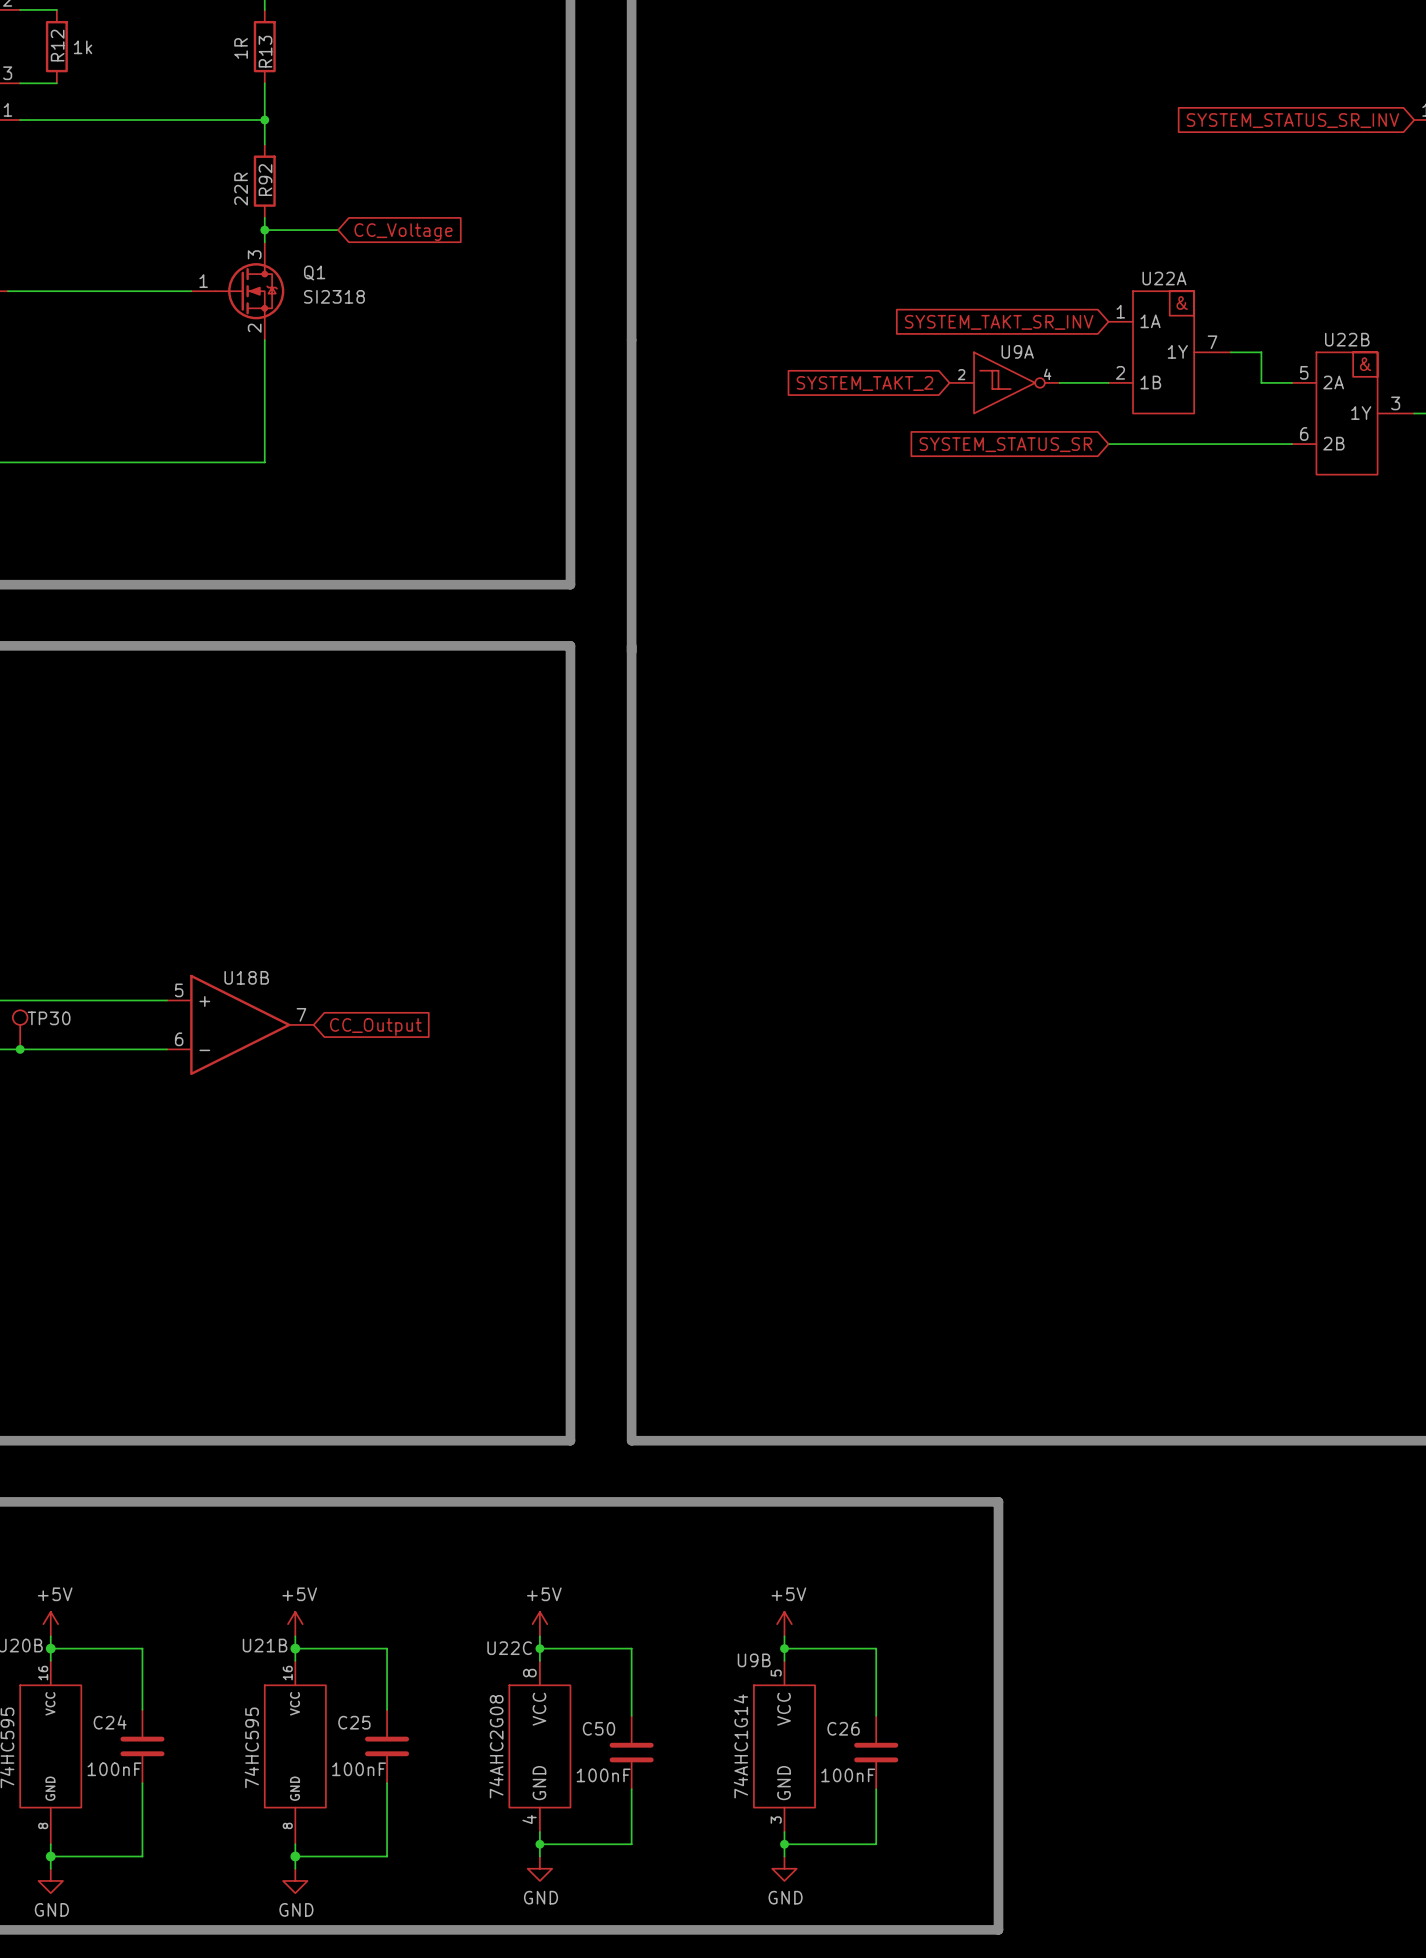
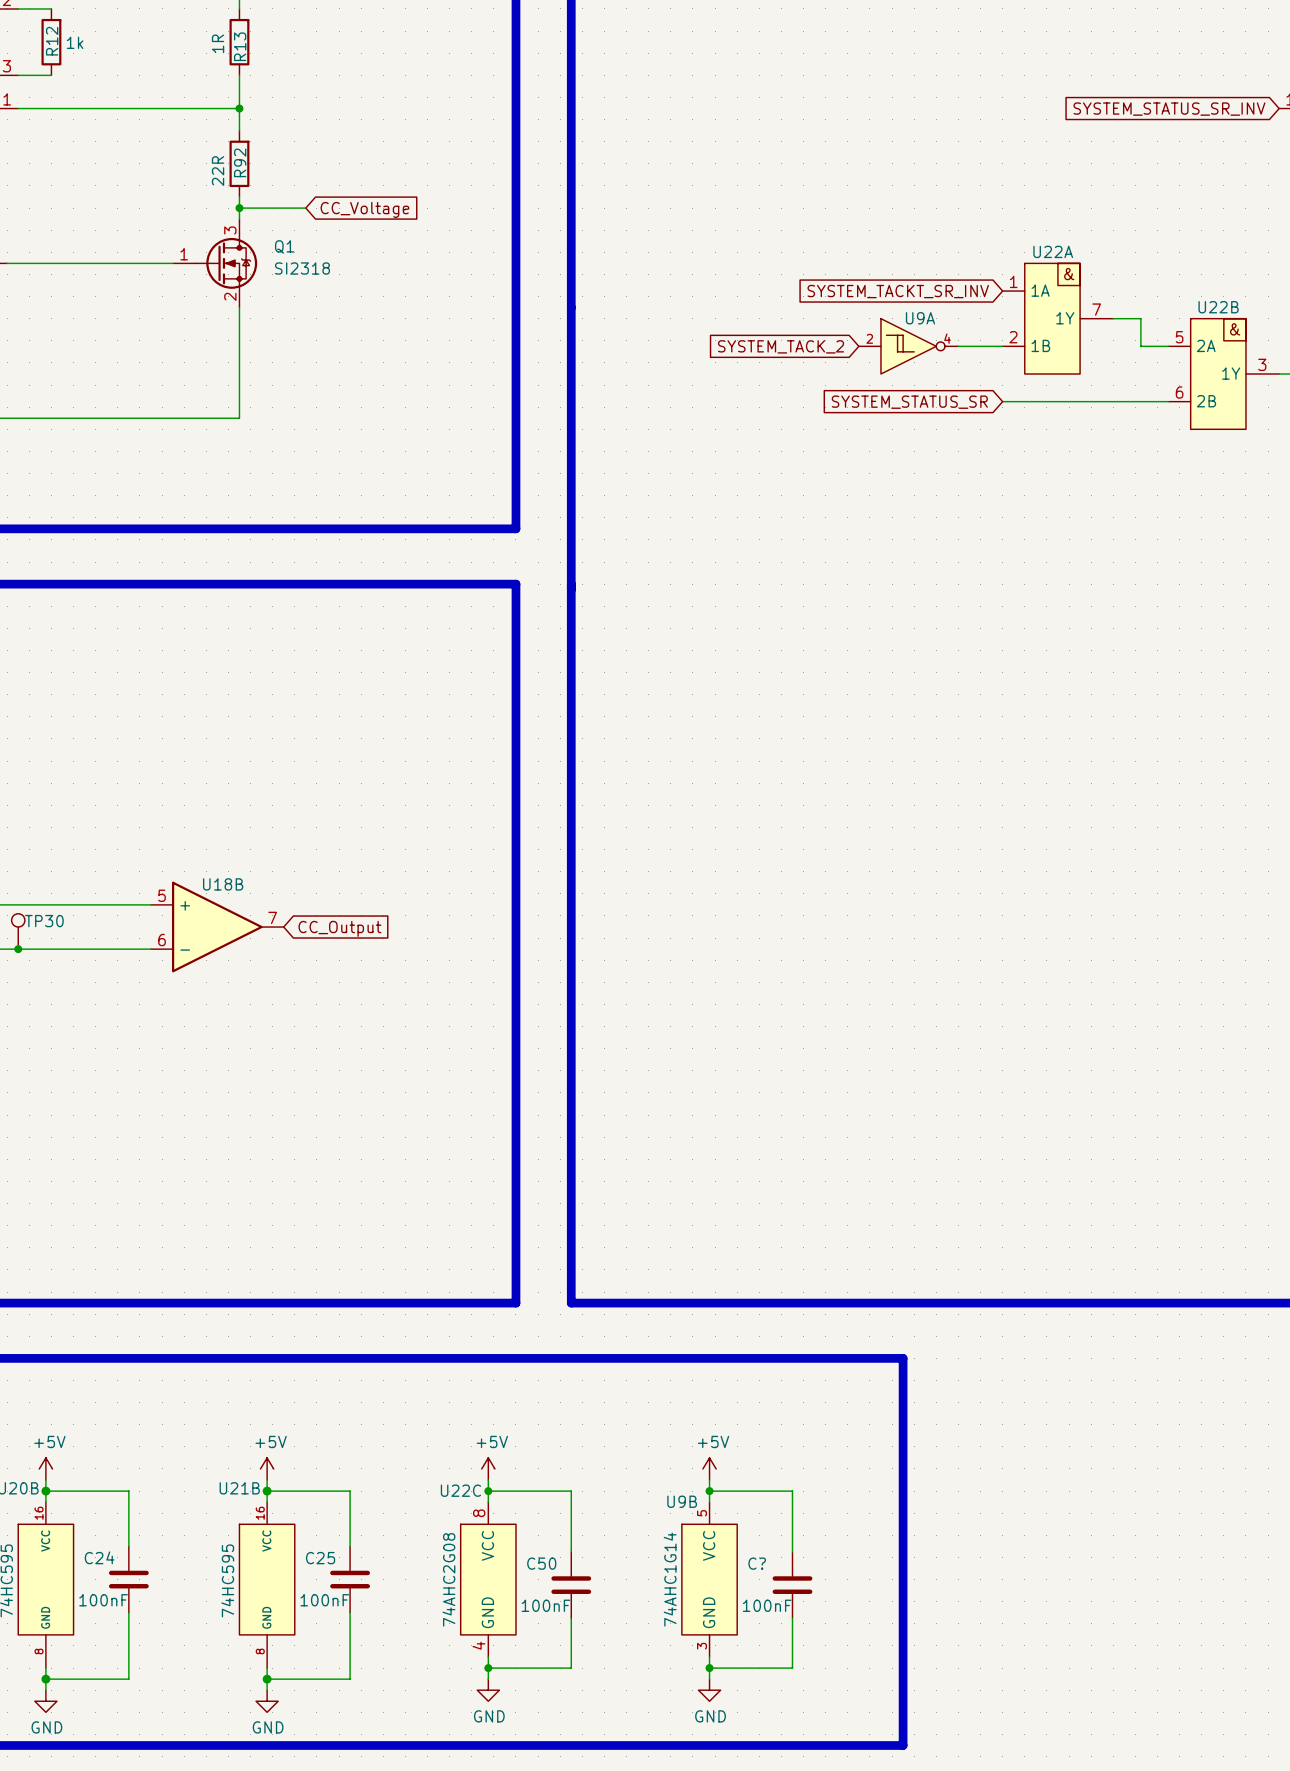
global label: SYSTEM_TAKT_SR_INV (999, 322) -> SYSTEM_TACKT_SR_INV (898, 291)
global label: SYSTEM_TAKT_2 (864, 383) -> SYSTEM_TACK_2 (781, 346)
C26 name: C26 (843, 1728) -> C? (757, 1563)

